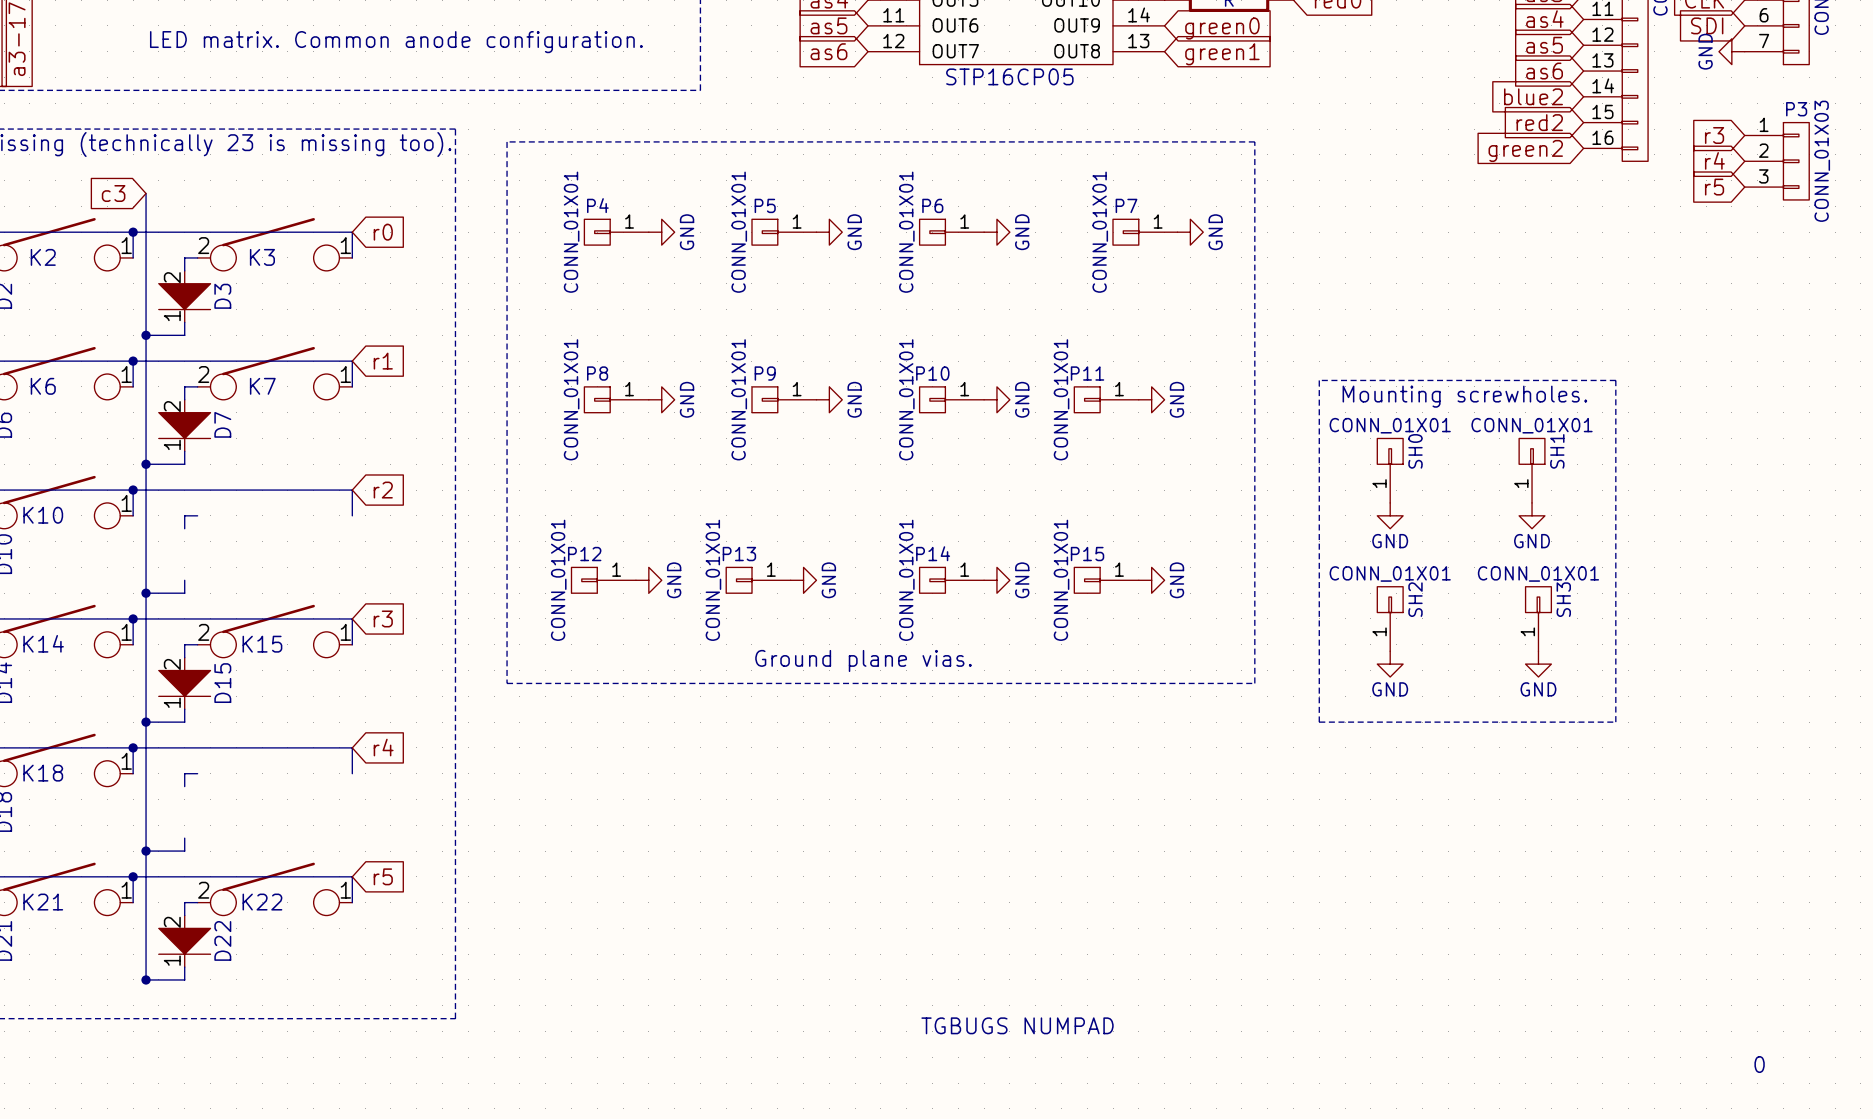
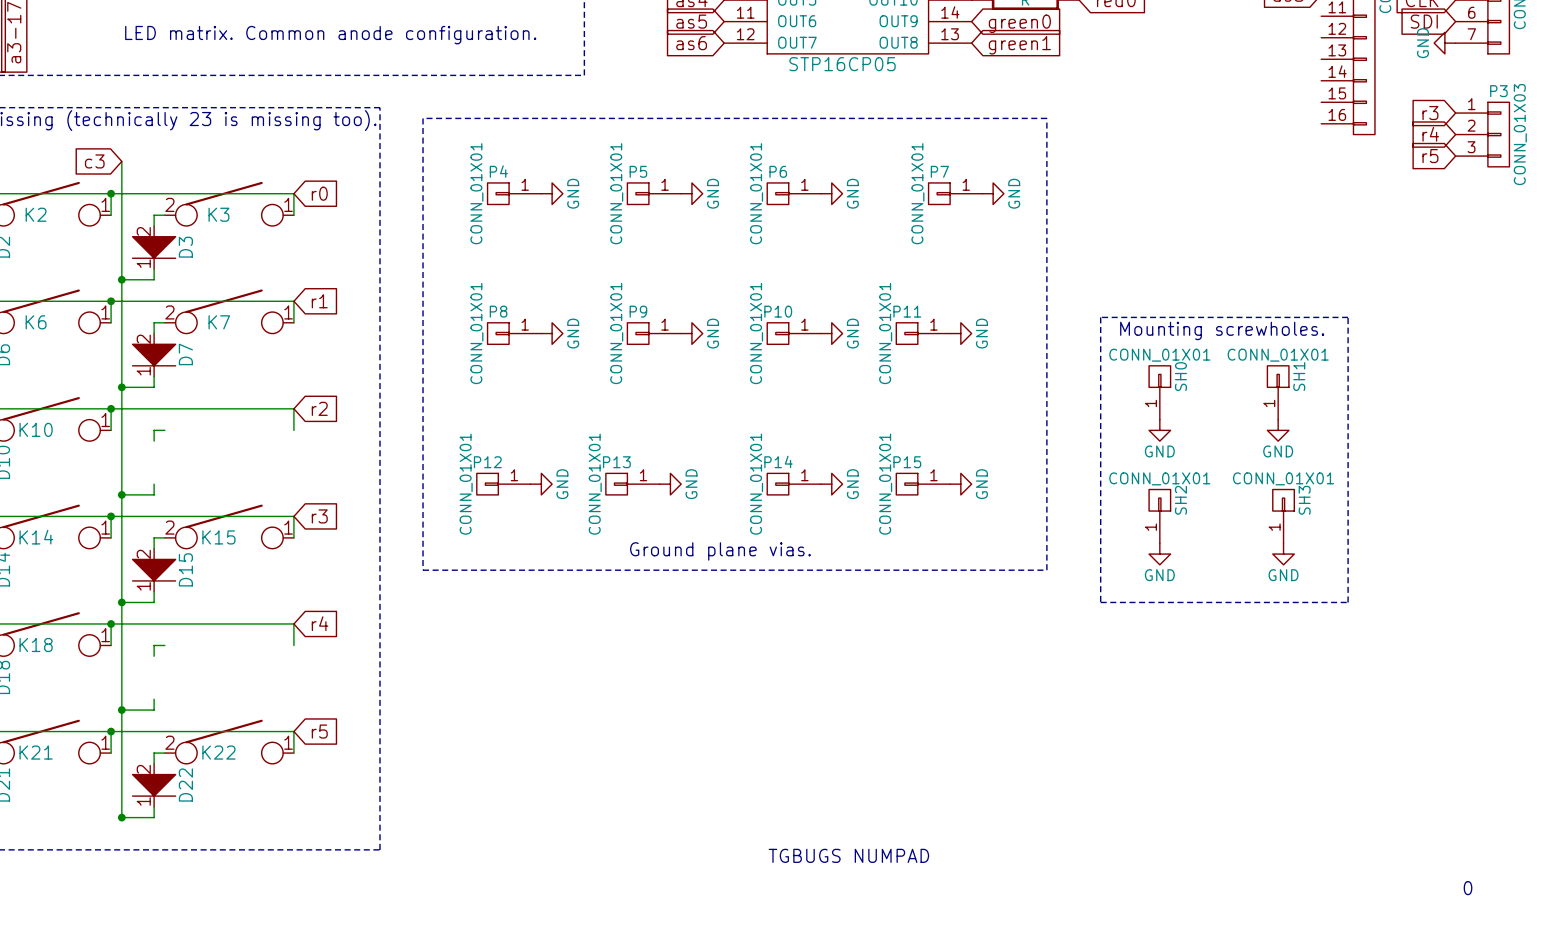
global label: as4 (1544, 19) -> none
global label: as5 (1544, 45) -> none
global label: as6 (1544, 71) -> none
global label: blue2 (1533, 96) -> none
global label: red2 (1539, 122) -> none
global label: green2 (1525, 150) -> none

